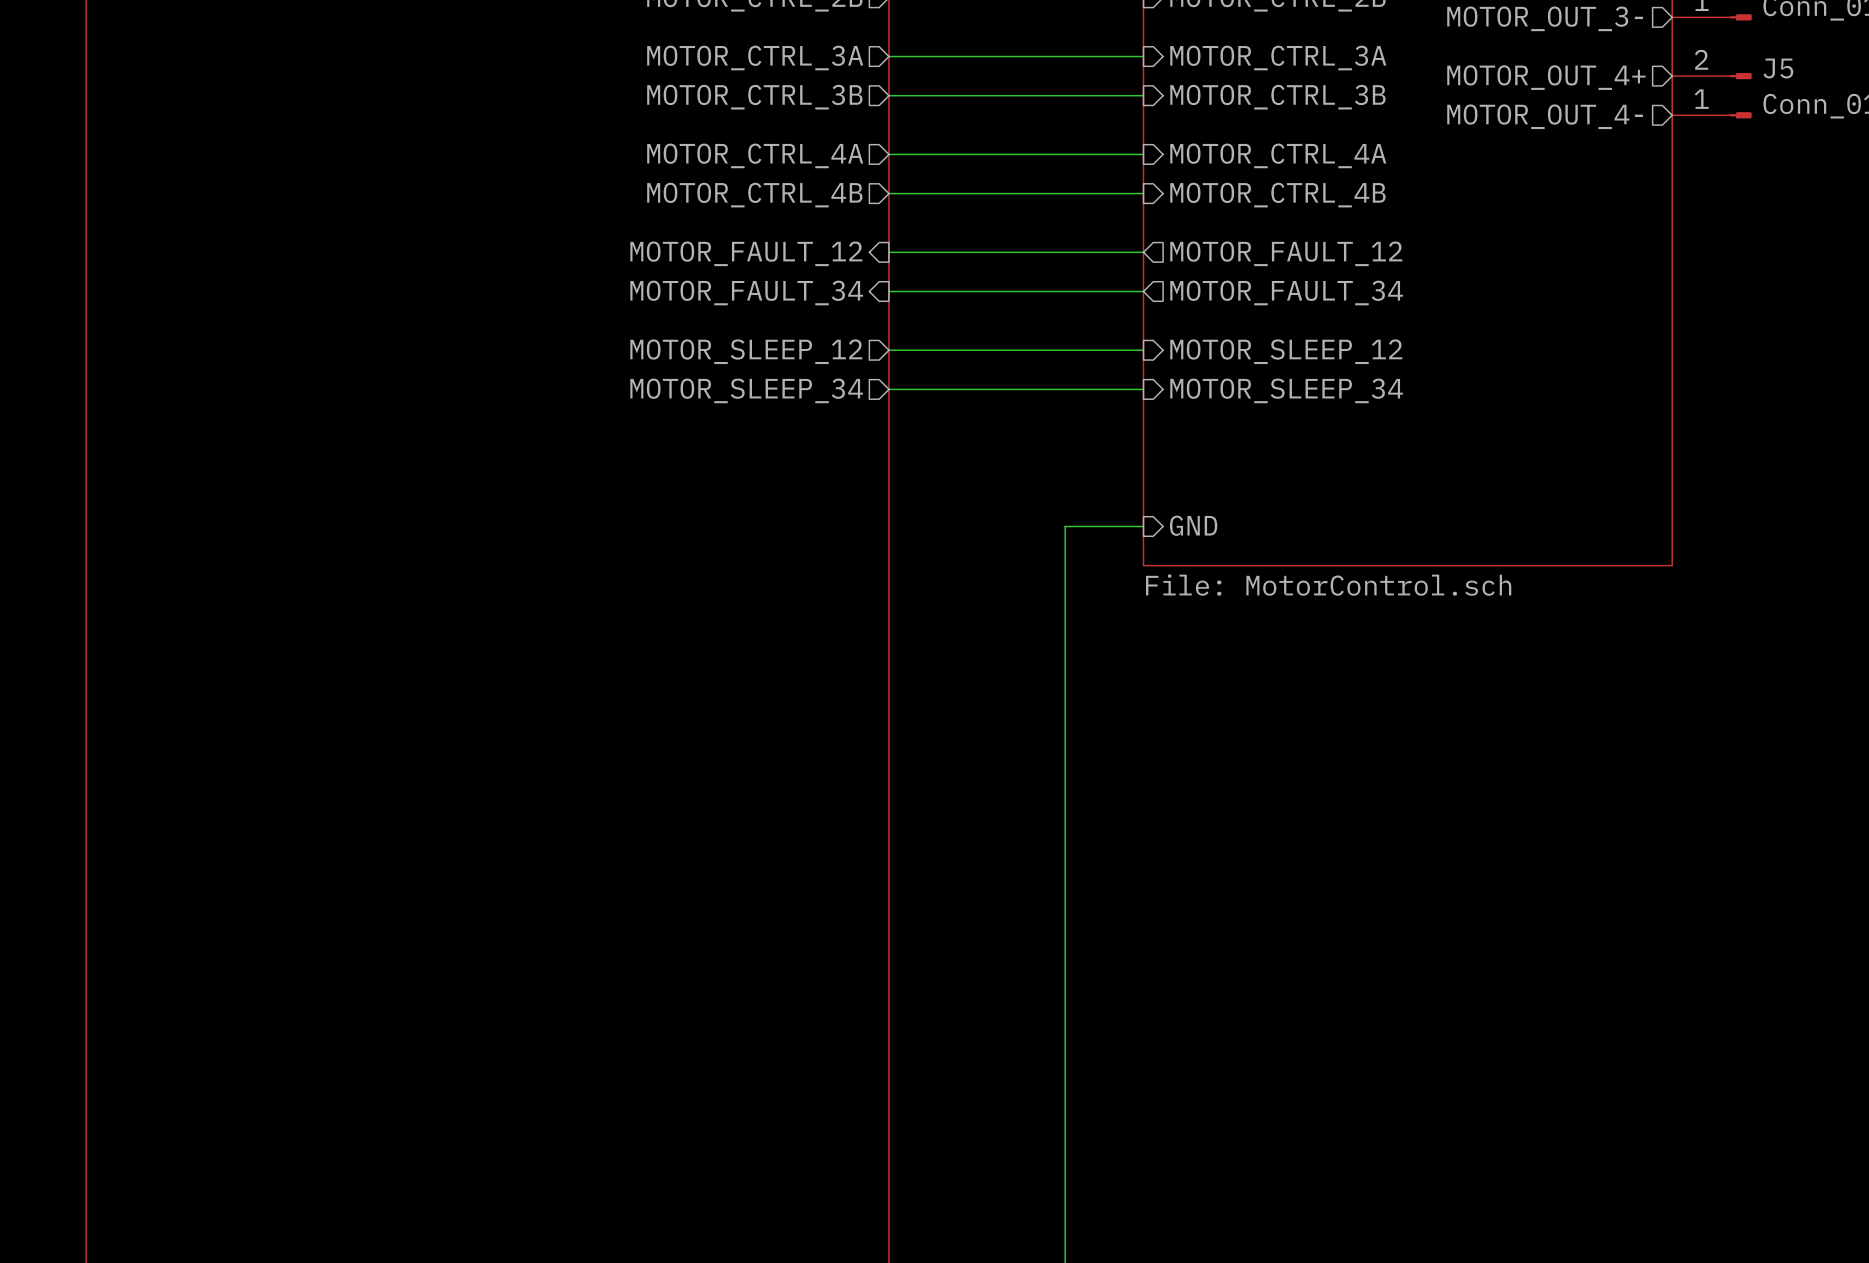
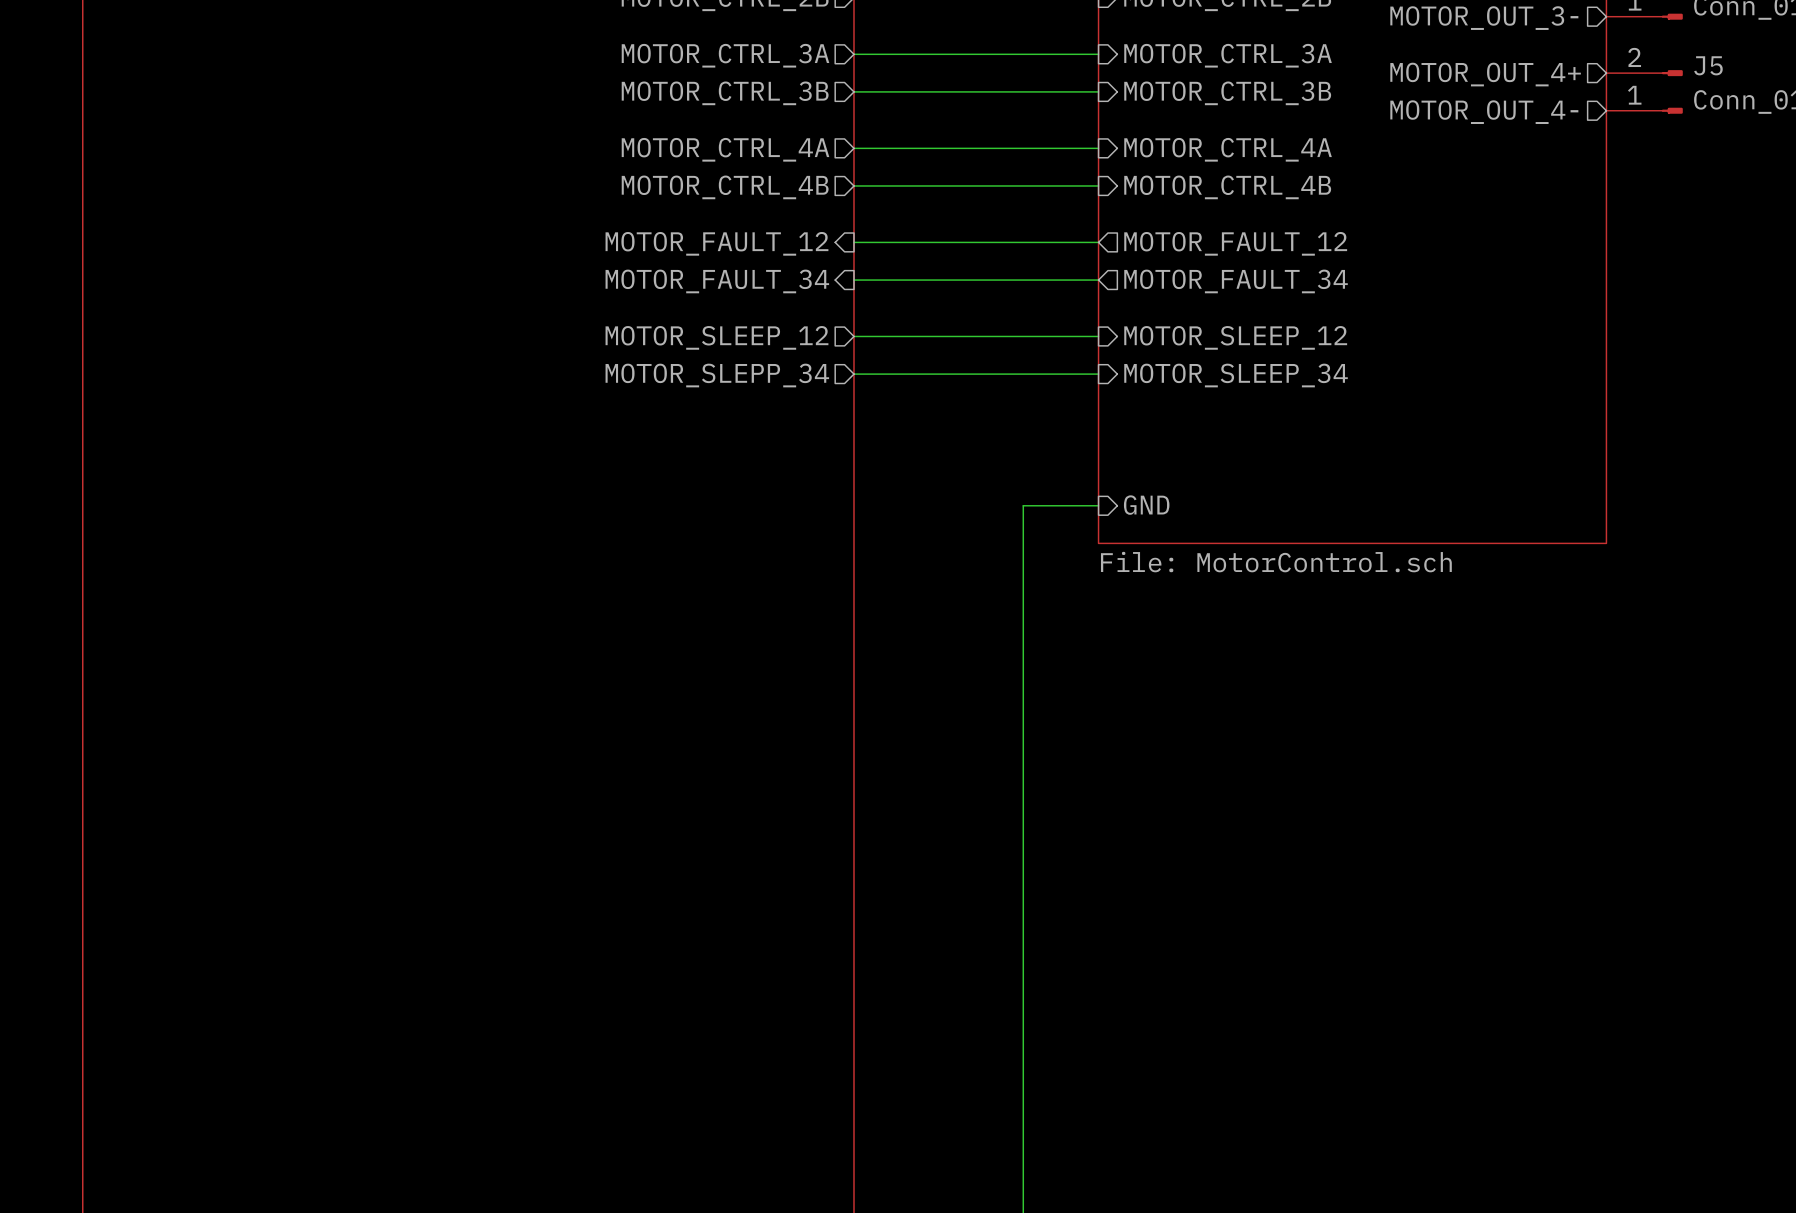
sheet pin: MOTOR_SLEEP_34 (746, 390) -> MOTOR_SLEPP_34 (717, 375)

